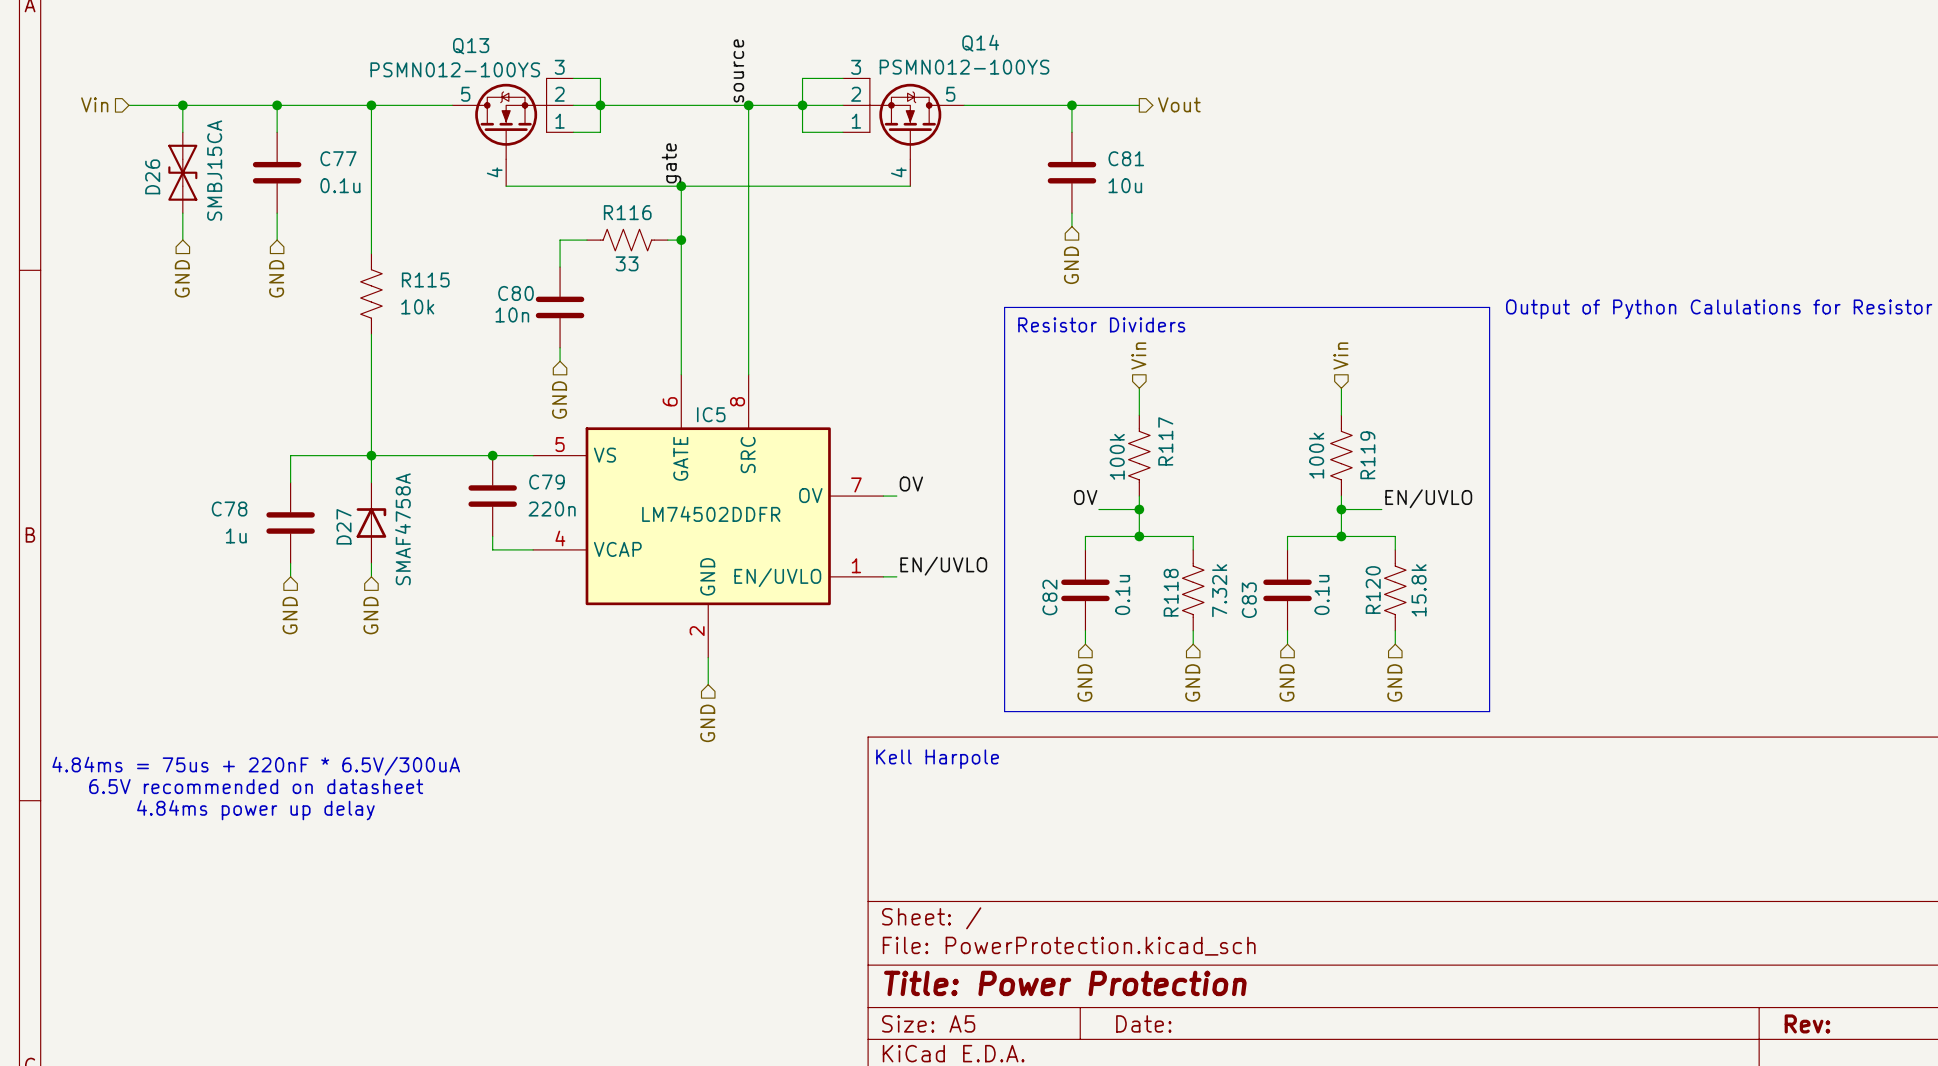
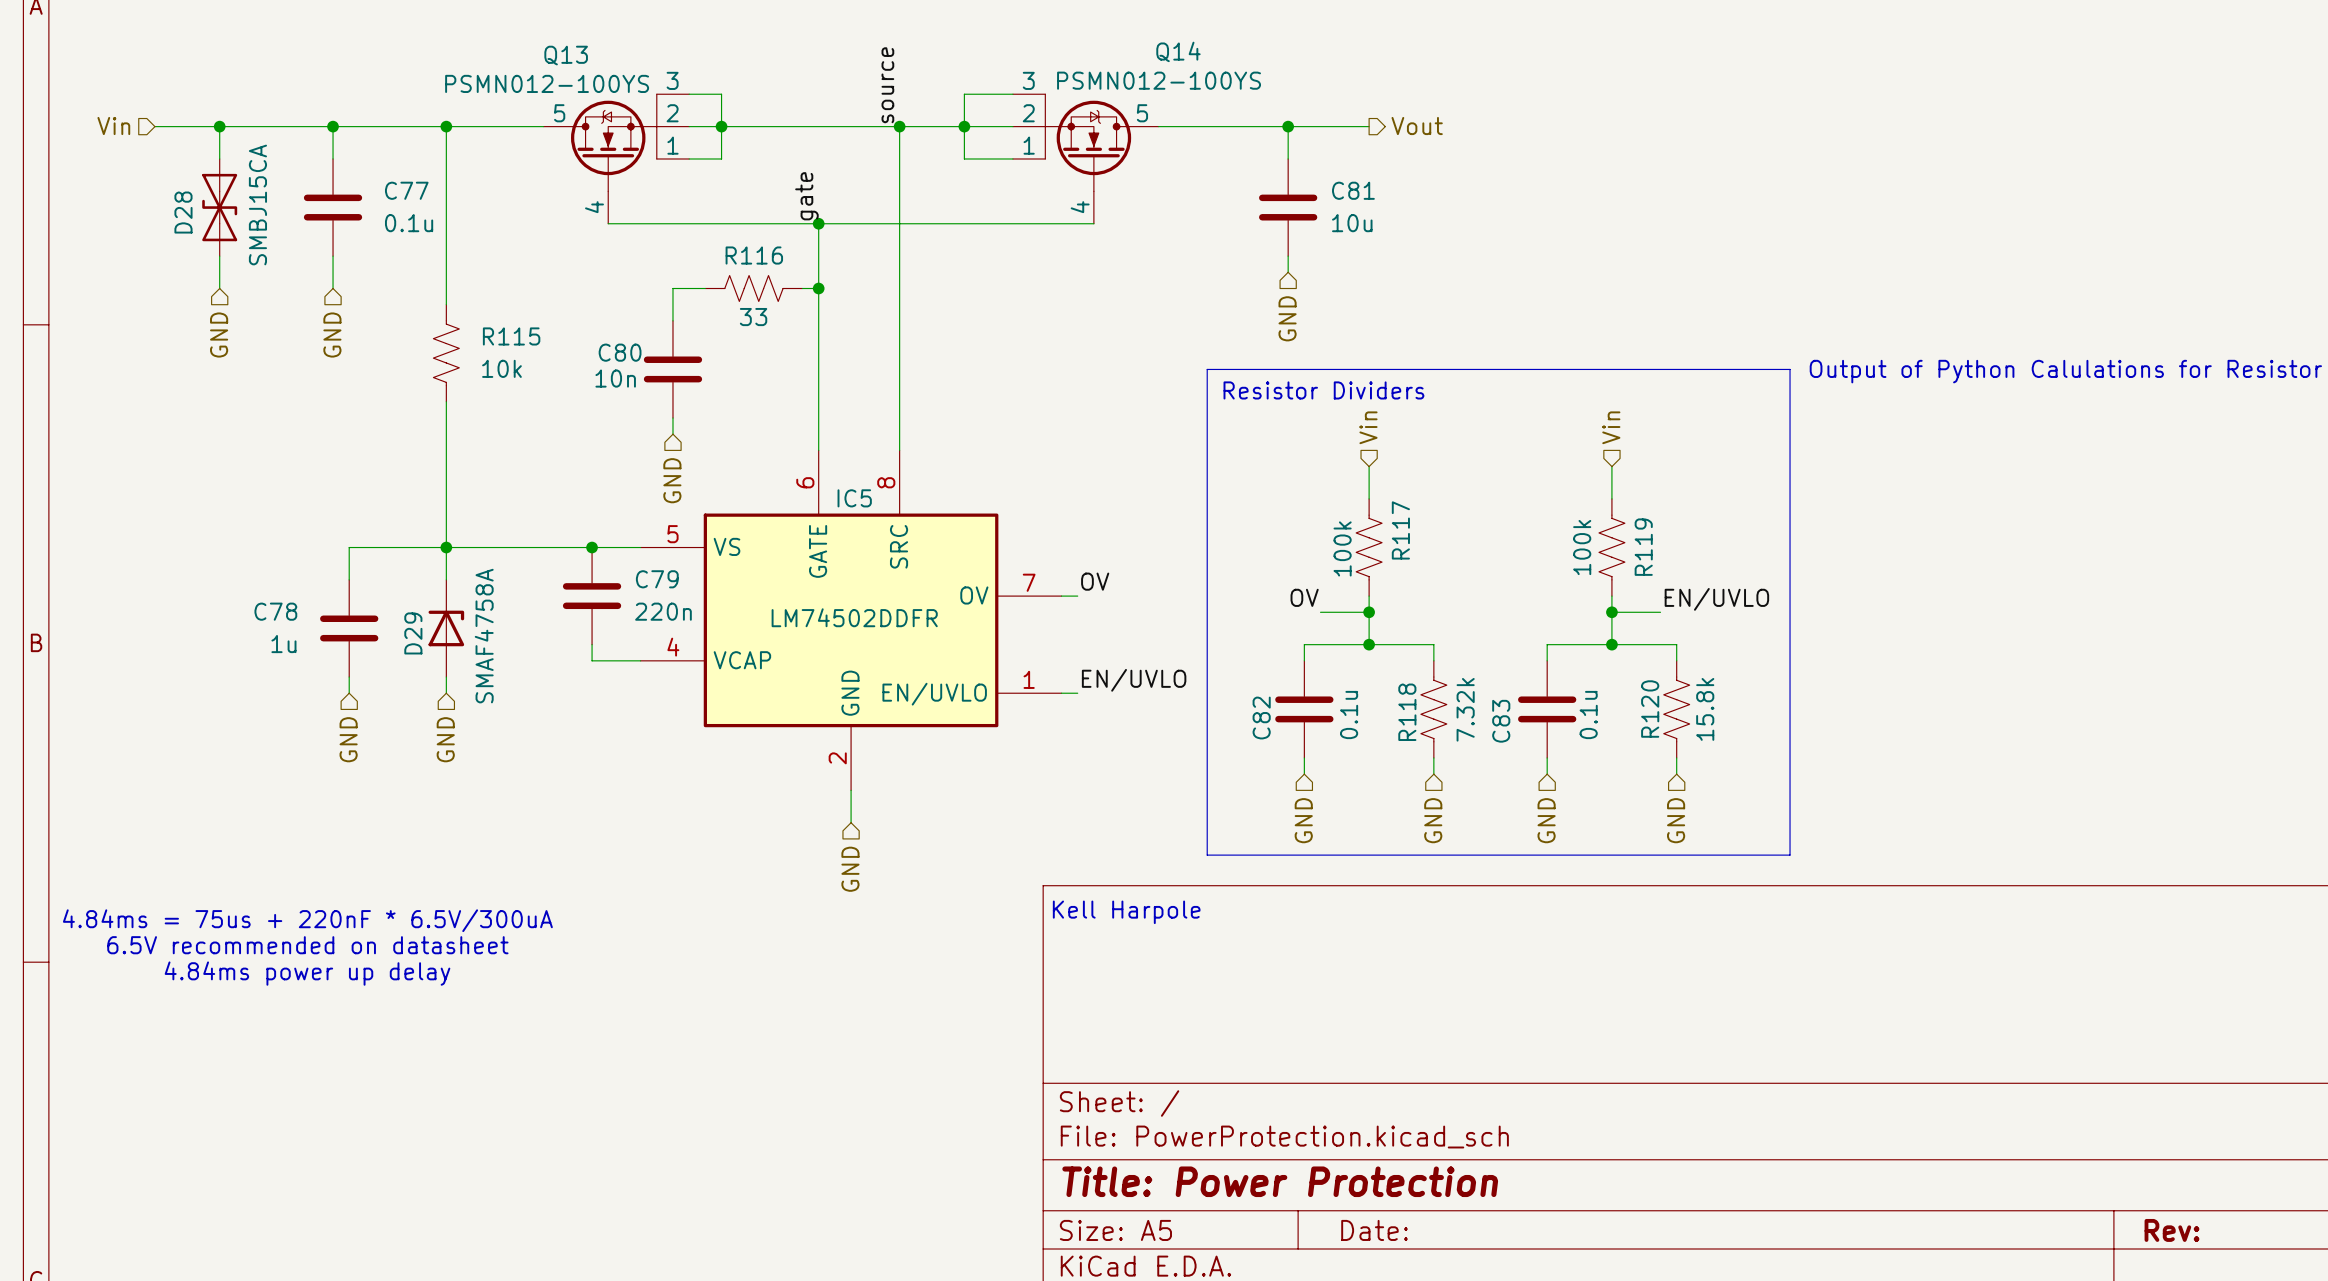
D26 name: D26 (152, 176) -> D28 (183, 212)
D27 name: D27 (343, 526) -> D29 (413, 633)

